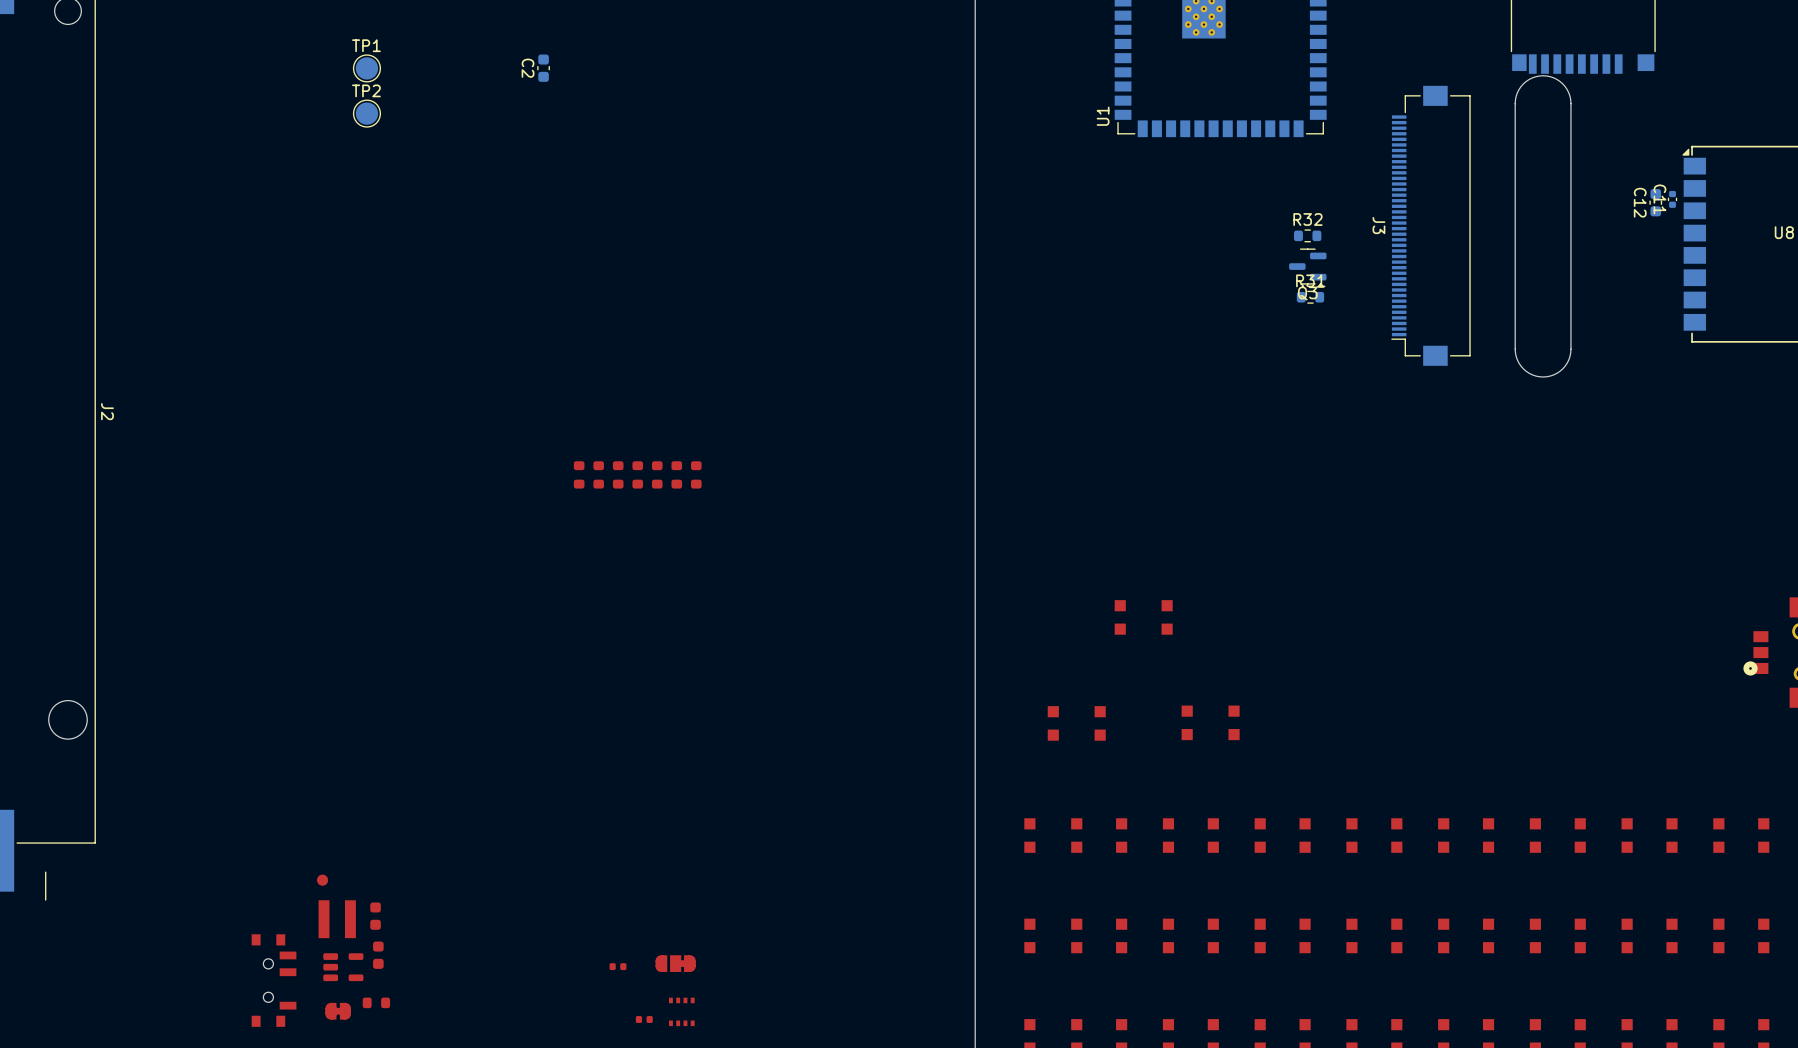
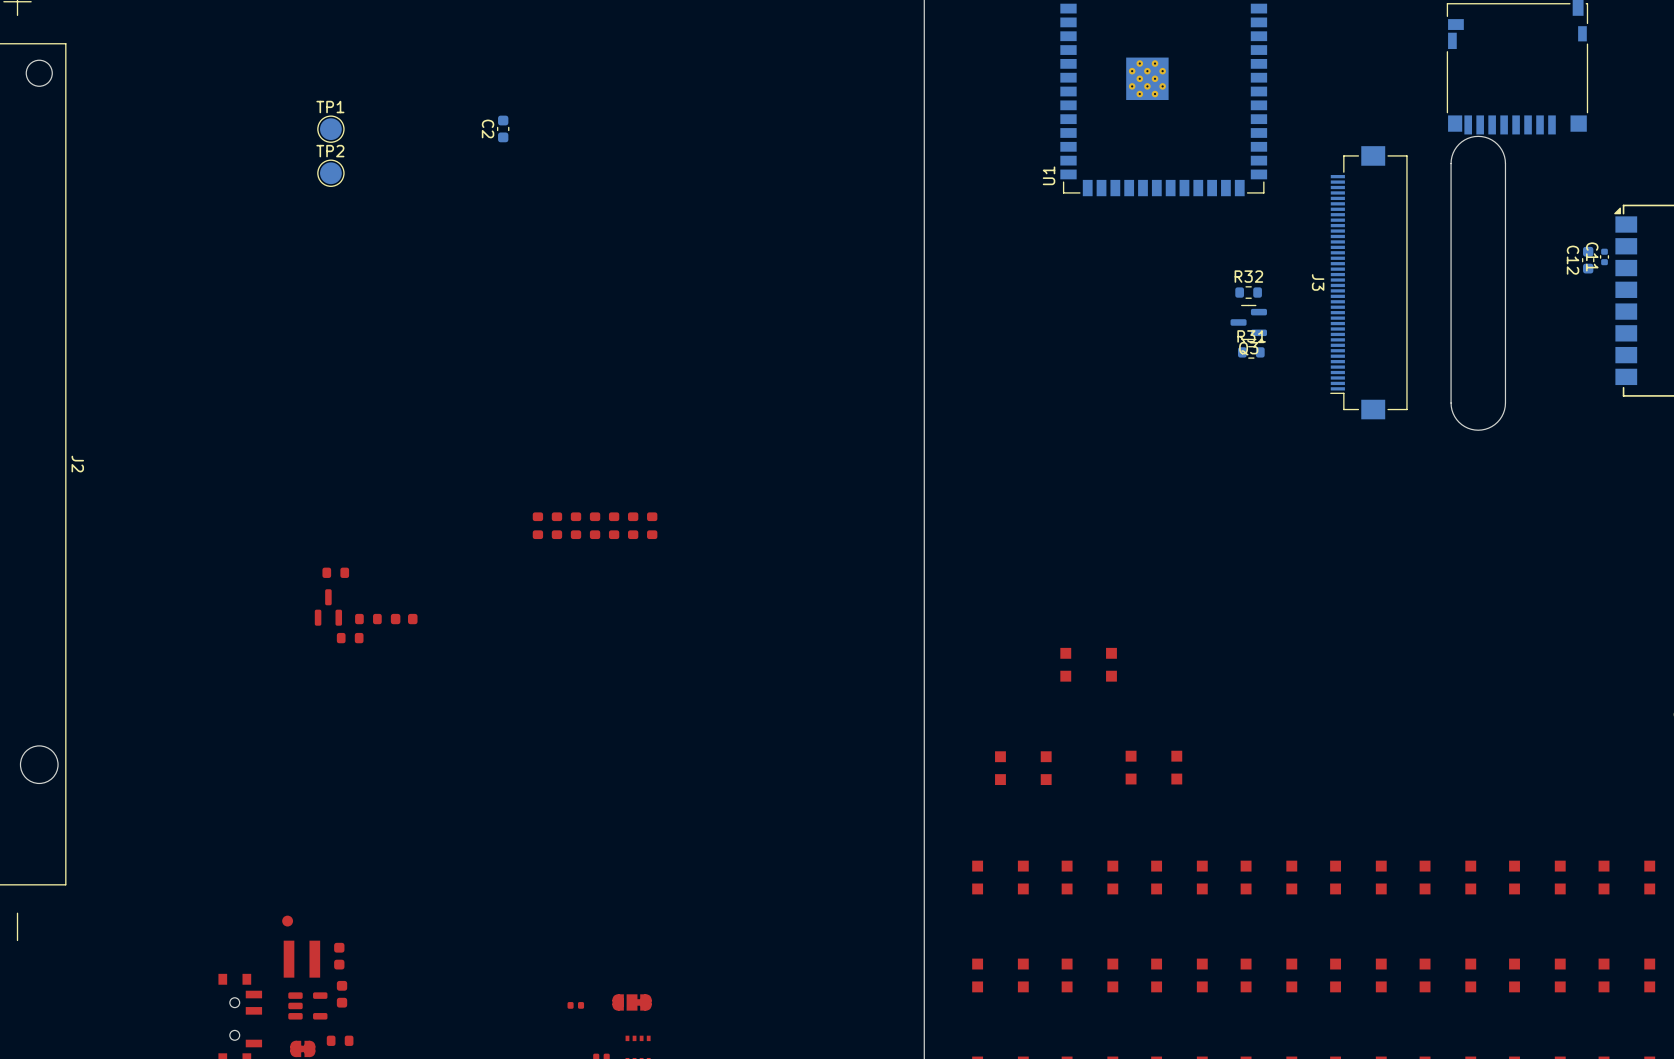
part: none -> (335, 572)
part: none -> (328, 607)
part: none -> (368, 619)
part: none -> (404, 619)
part: none -> (350, 638)

